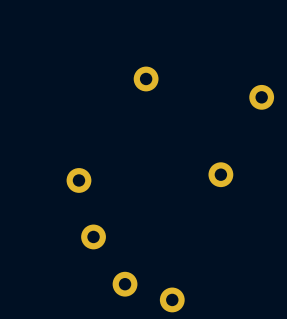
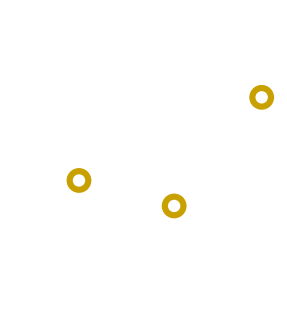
part: (146, 78) -> none
part: (220, 174) -> none
part: none -> (174, 205)
part: (93, 236) -> none
part: (125, 284) -> none
part: (172, 299) -> none

